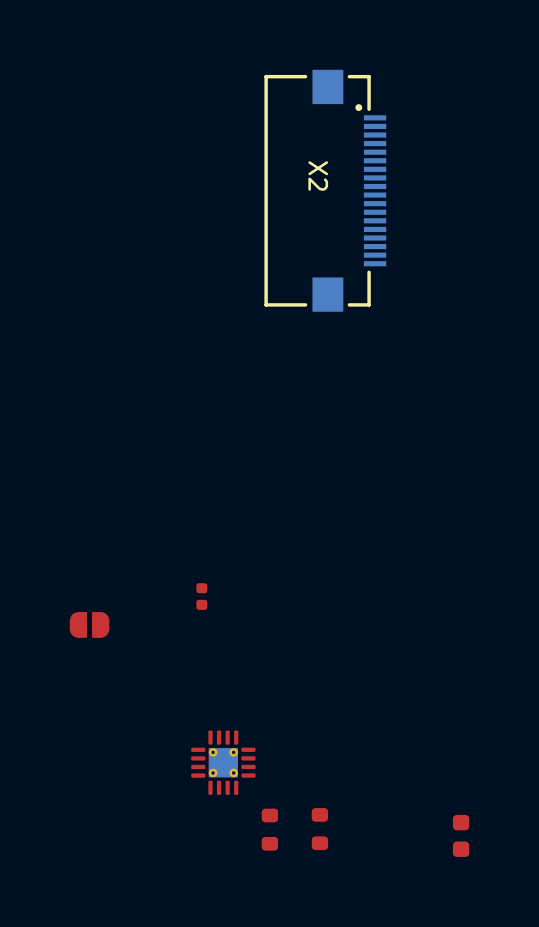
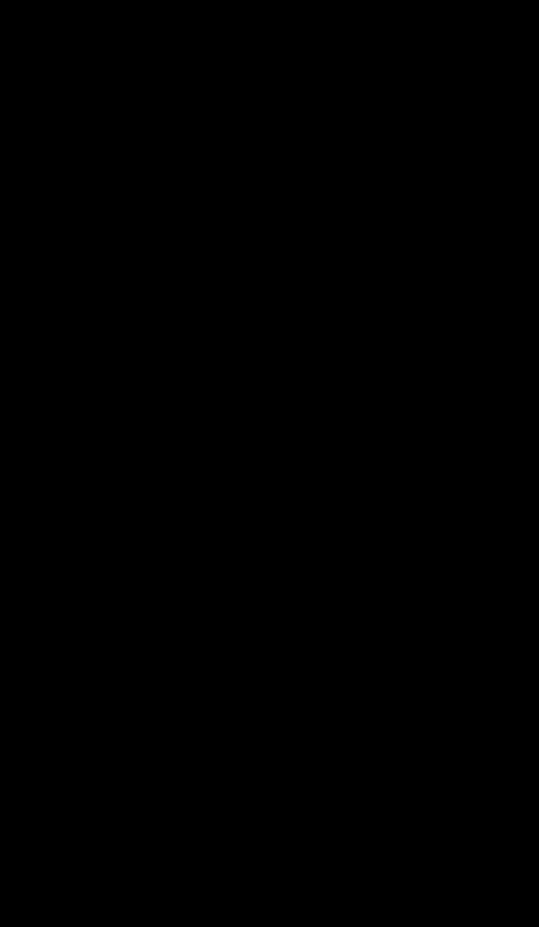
X2: (325, 190) -> none
part: (201, 596) -> none
part: (89, 624) -> none
part: (223, 762) -> none
part: (269, 829) -> none
part: (319, 829) -> none
part: (461, 835) -> none

